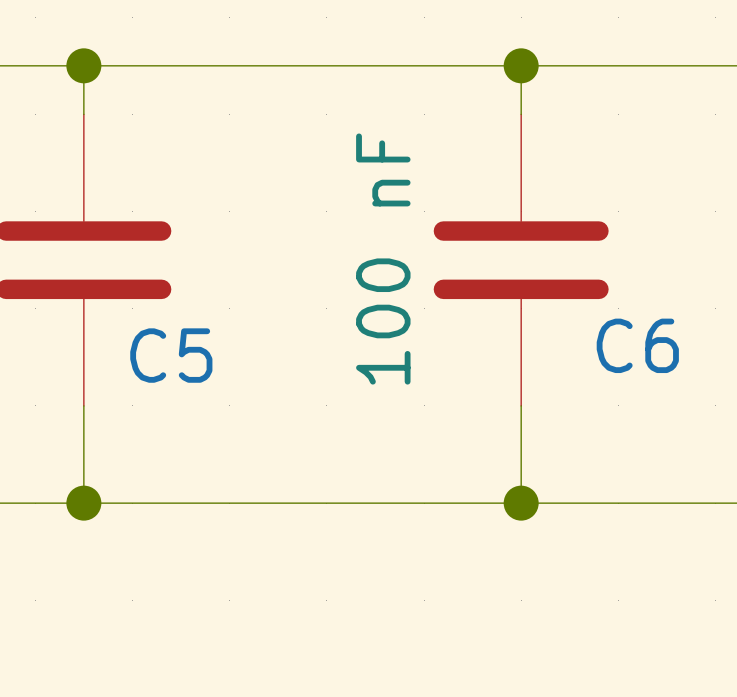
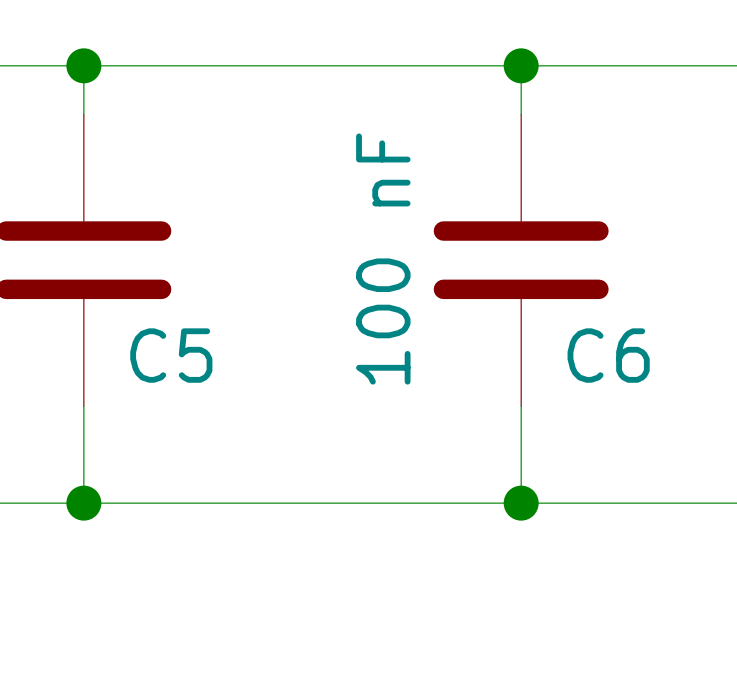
C6 name position: C6 (637, 345) -> C6 (608, 355)

